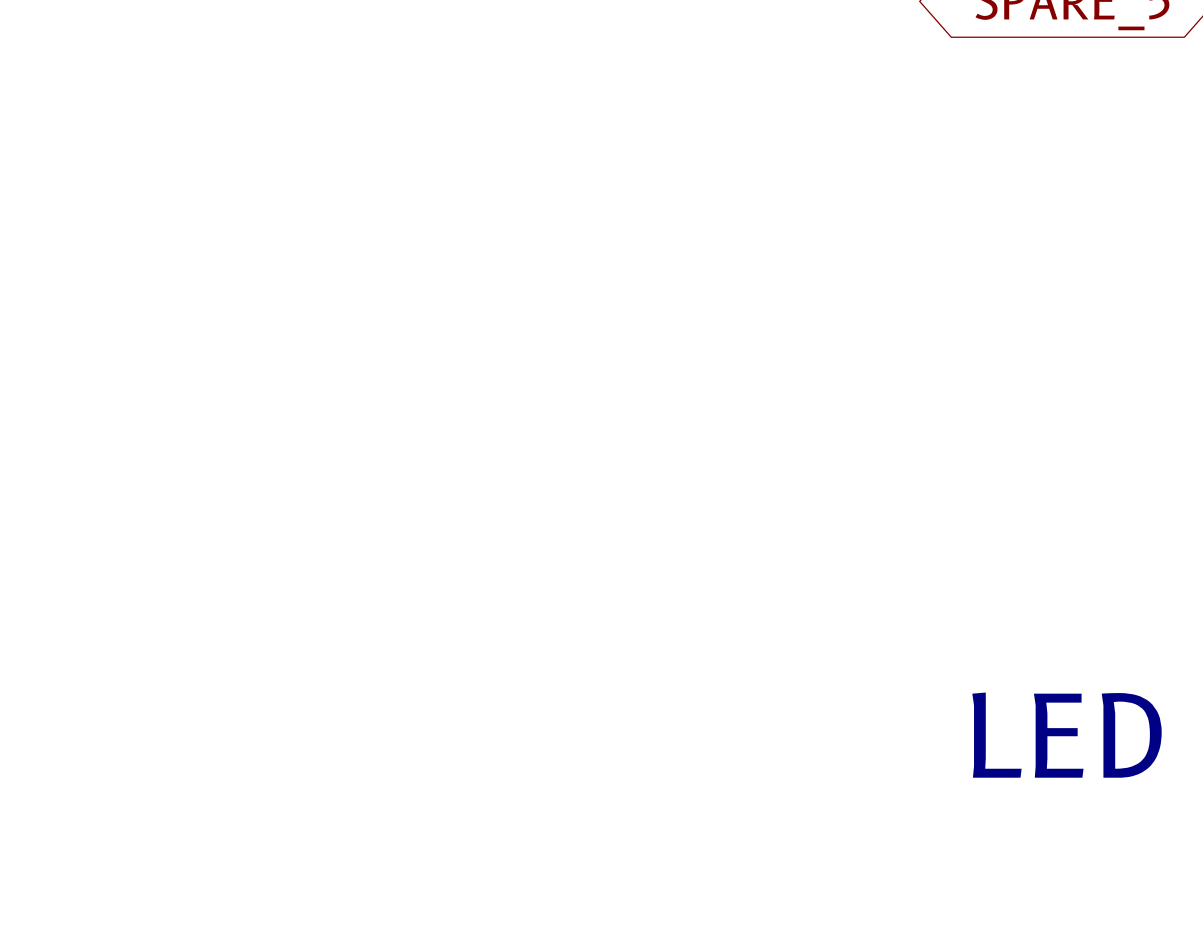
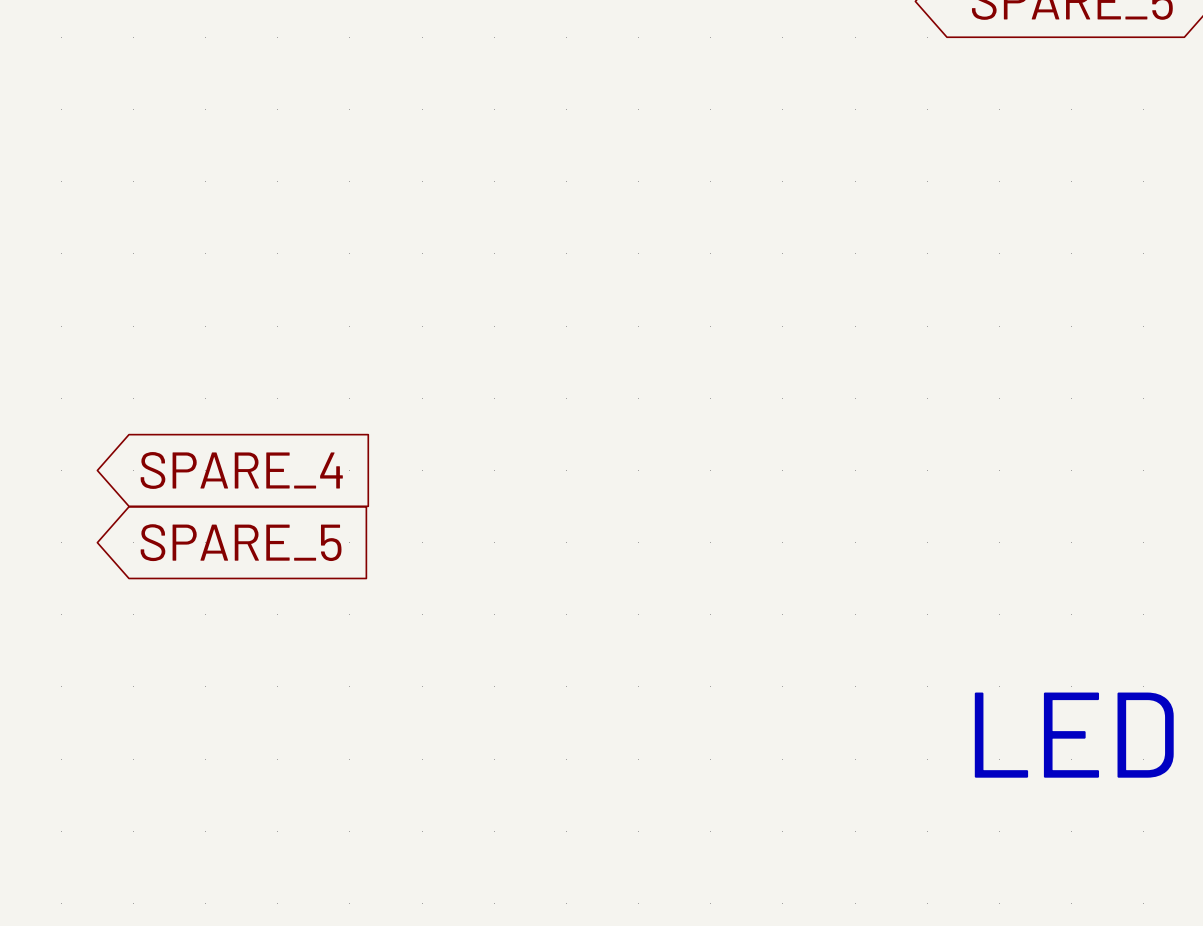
global label: none -> SPARE_4 (241, 470)
global label: none -> SPARE_5 (241, 542)

